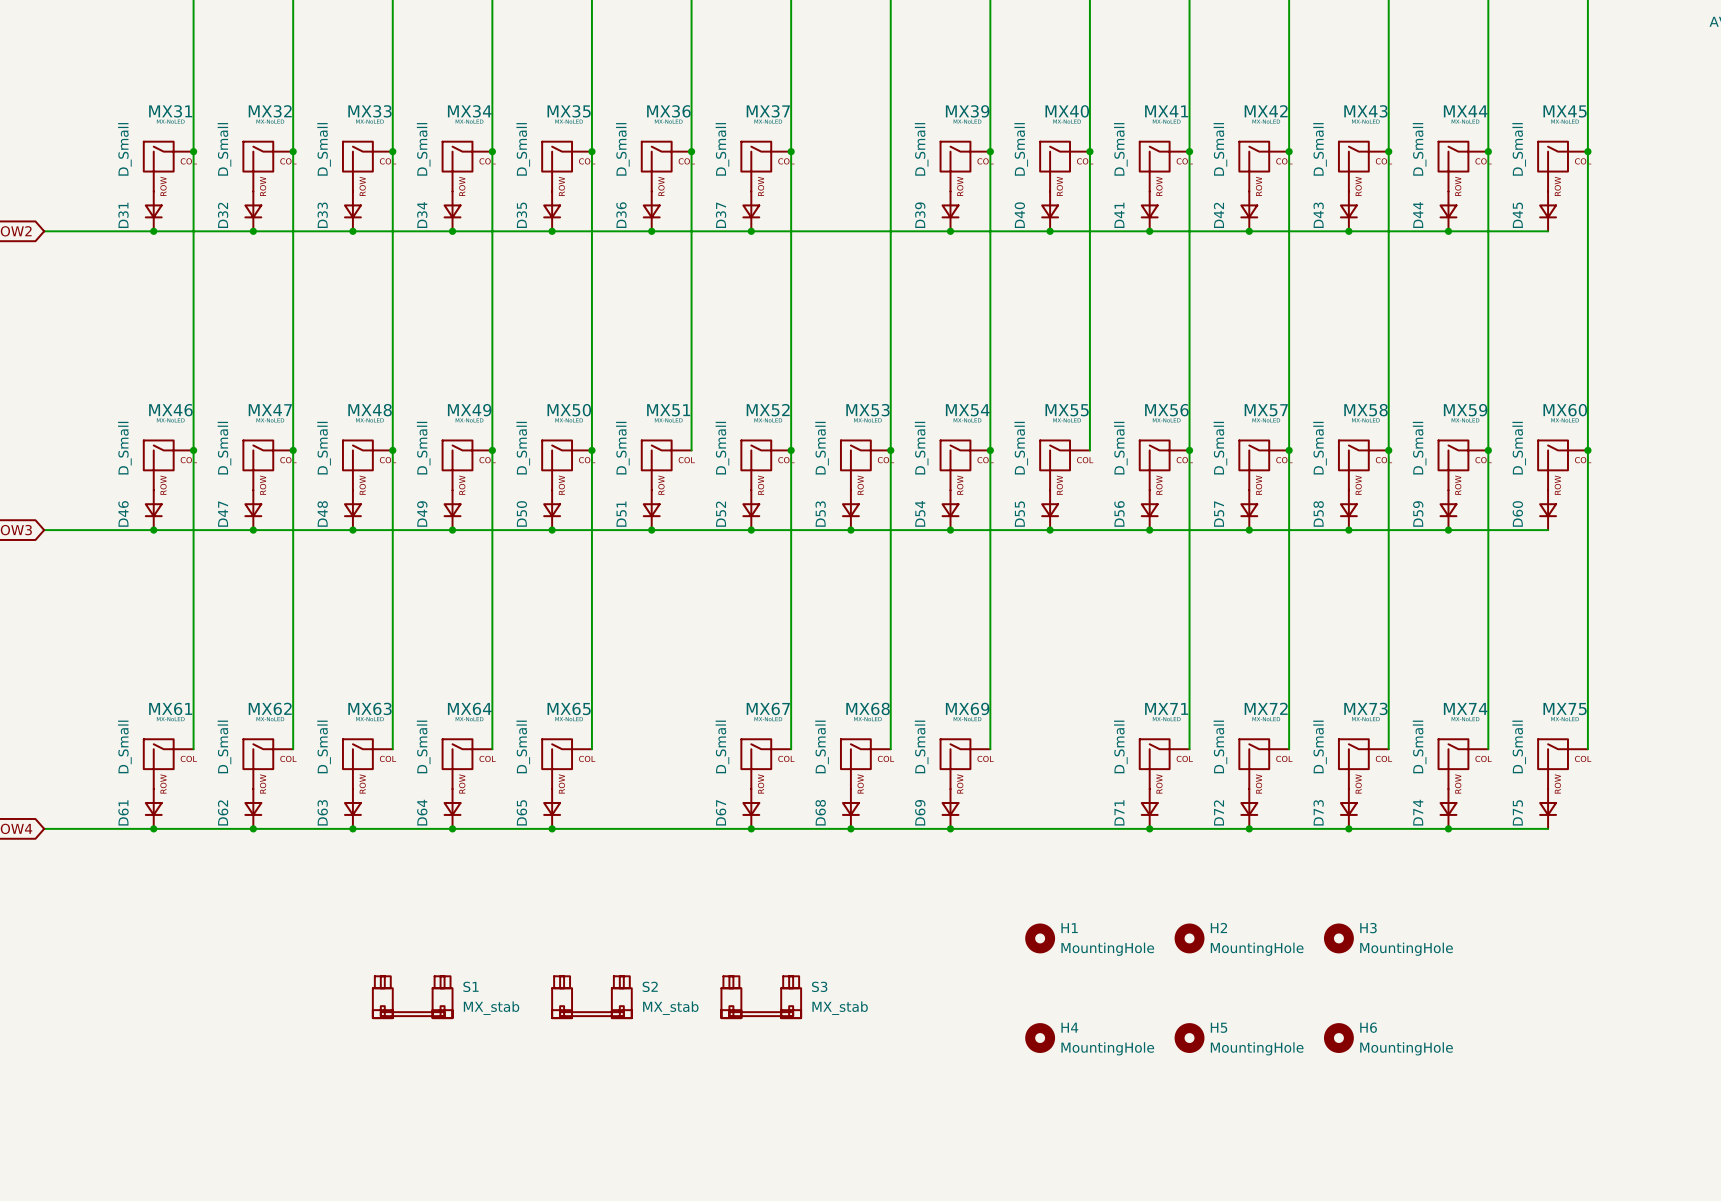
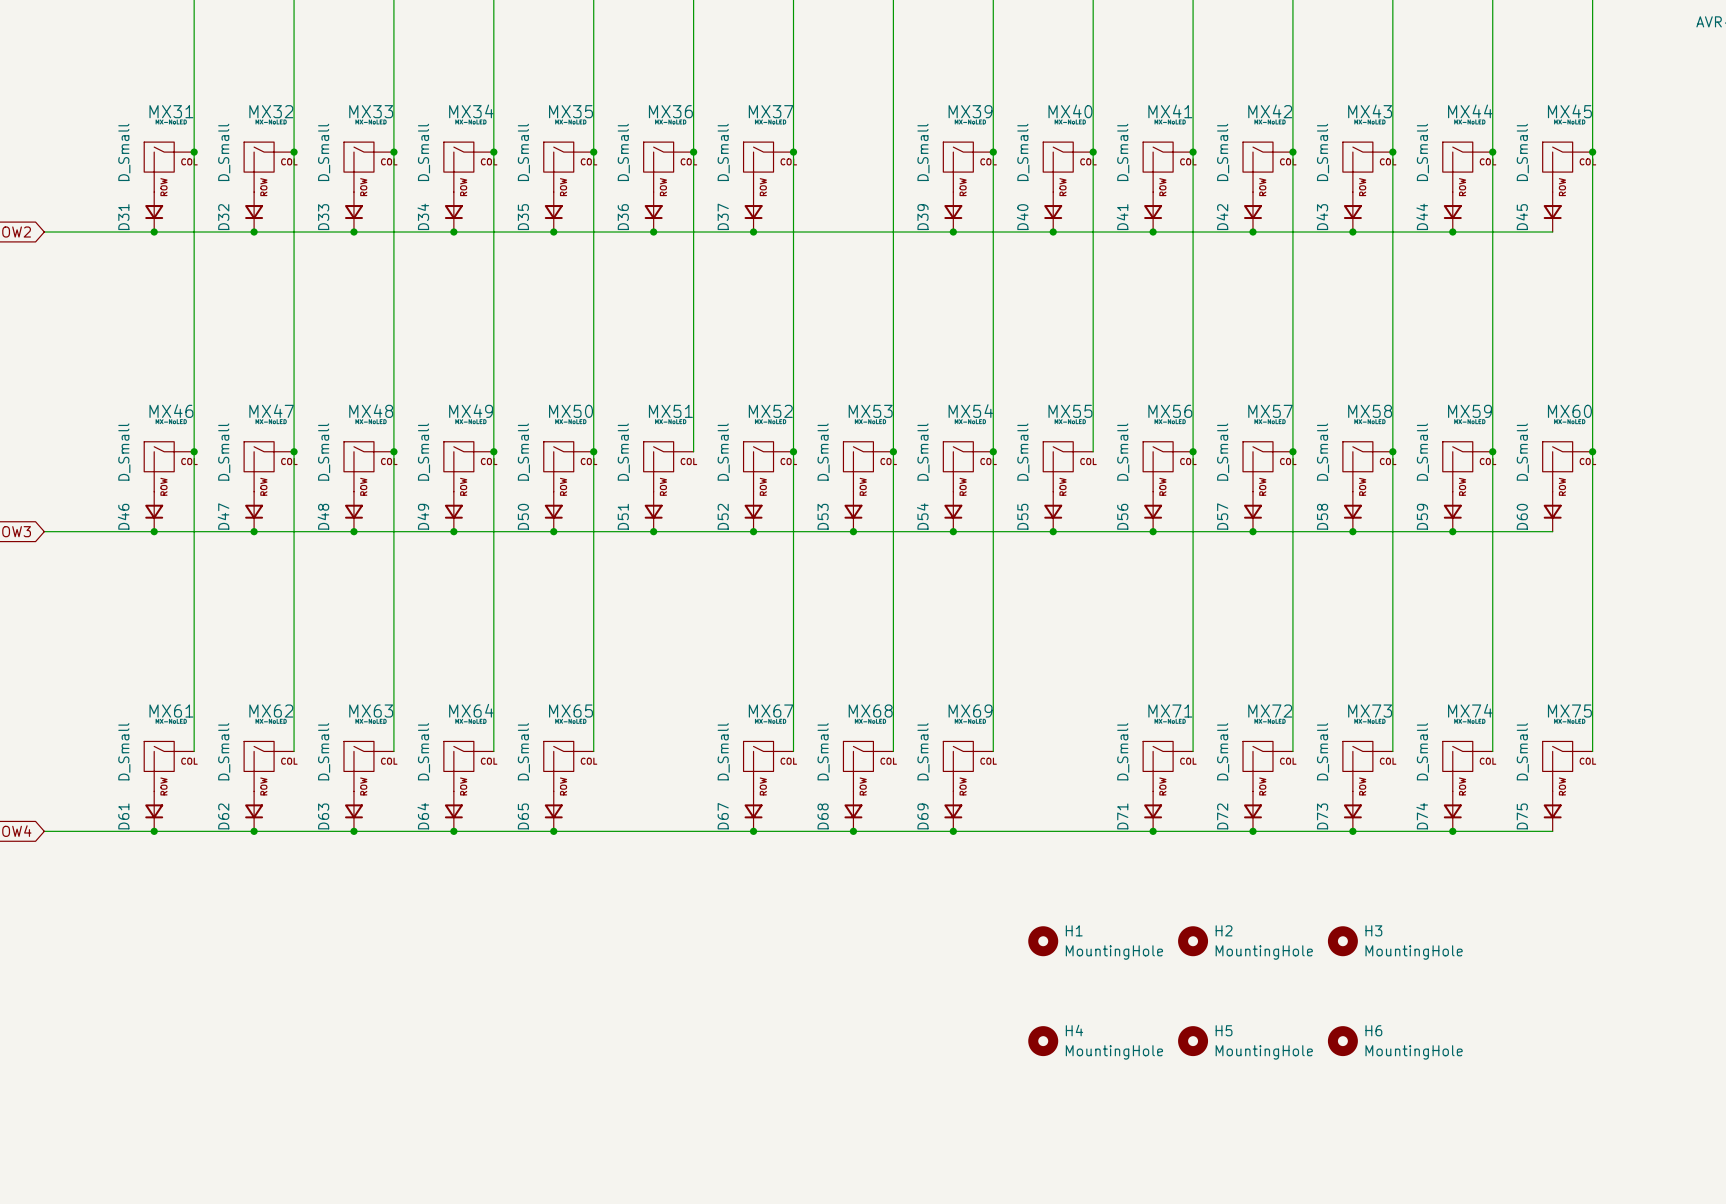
S1: MX_stab (412, 997) -> none
S2: MX_stab (591, 997) -> none
S3: MX_stab (761, 997) -> none

